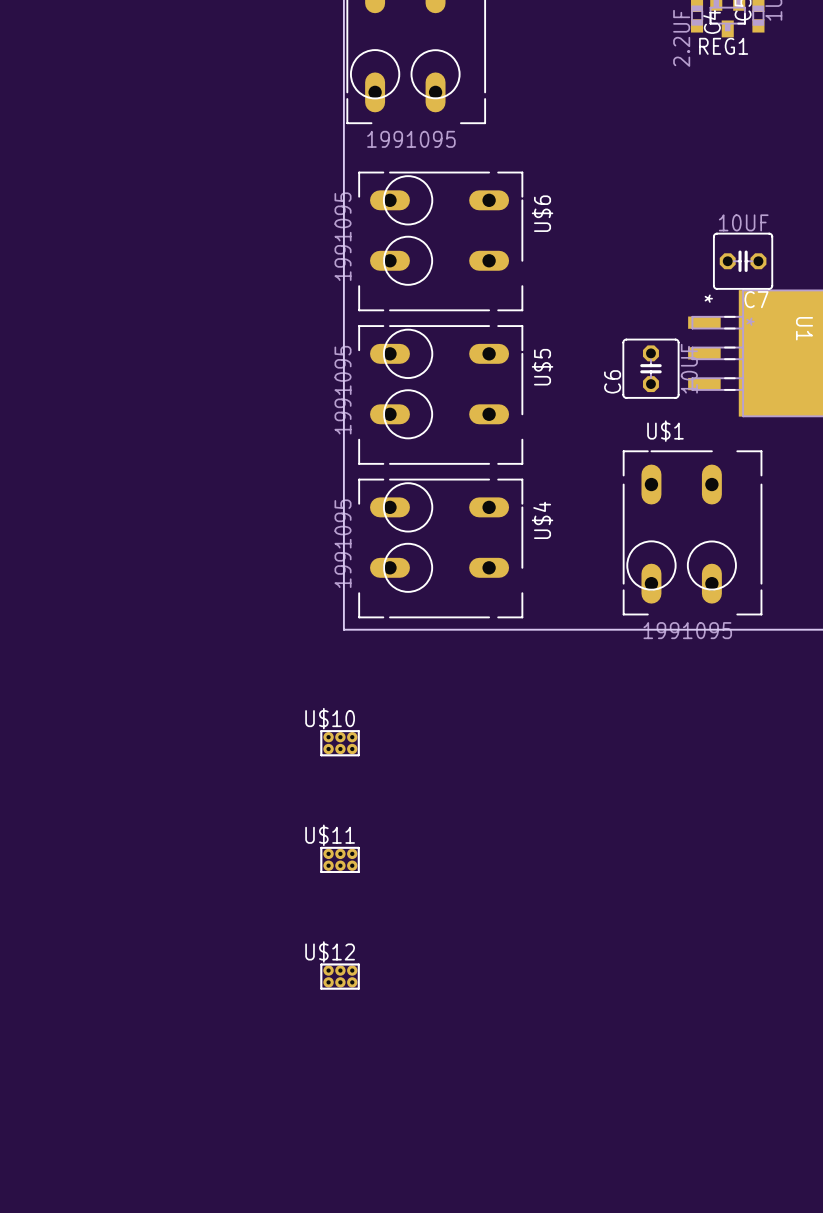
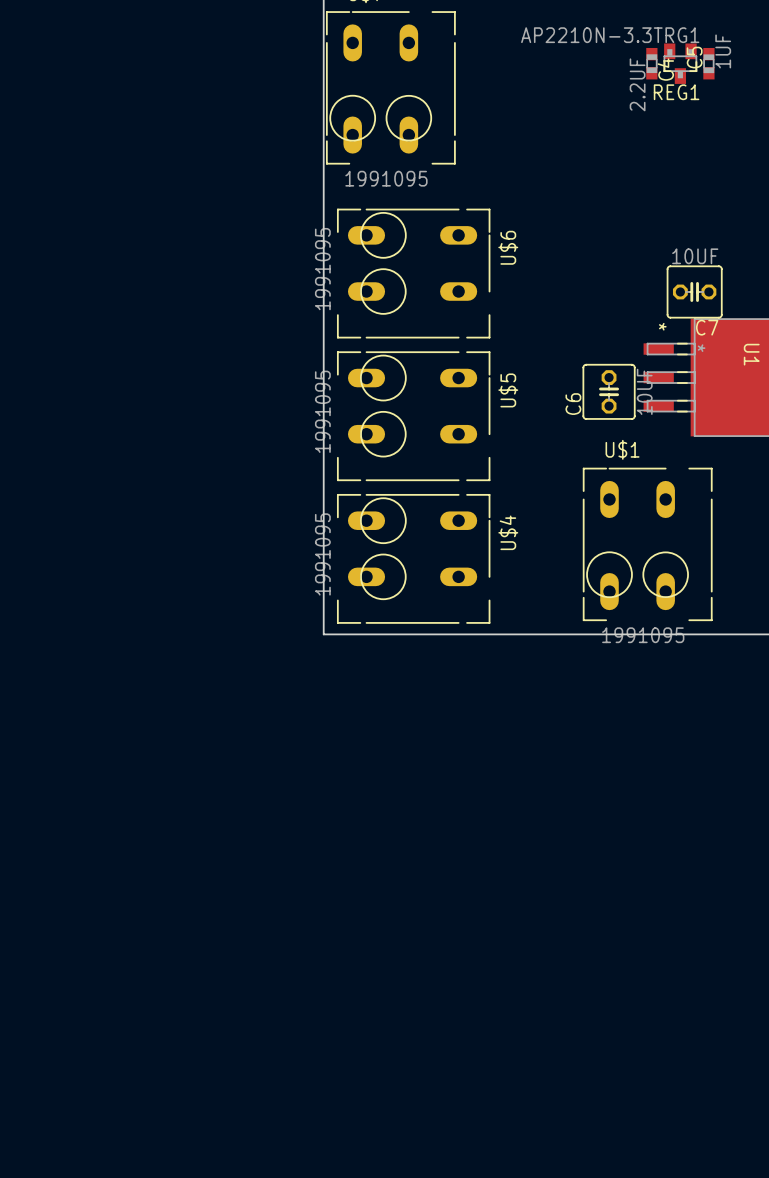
U$10: (340, 743) -> none
U$11: (340, 859) -> none
U$12: (340, 976) -> none

